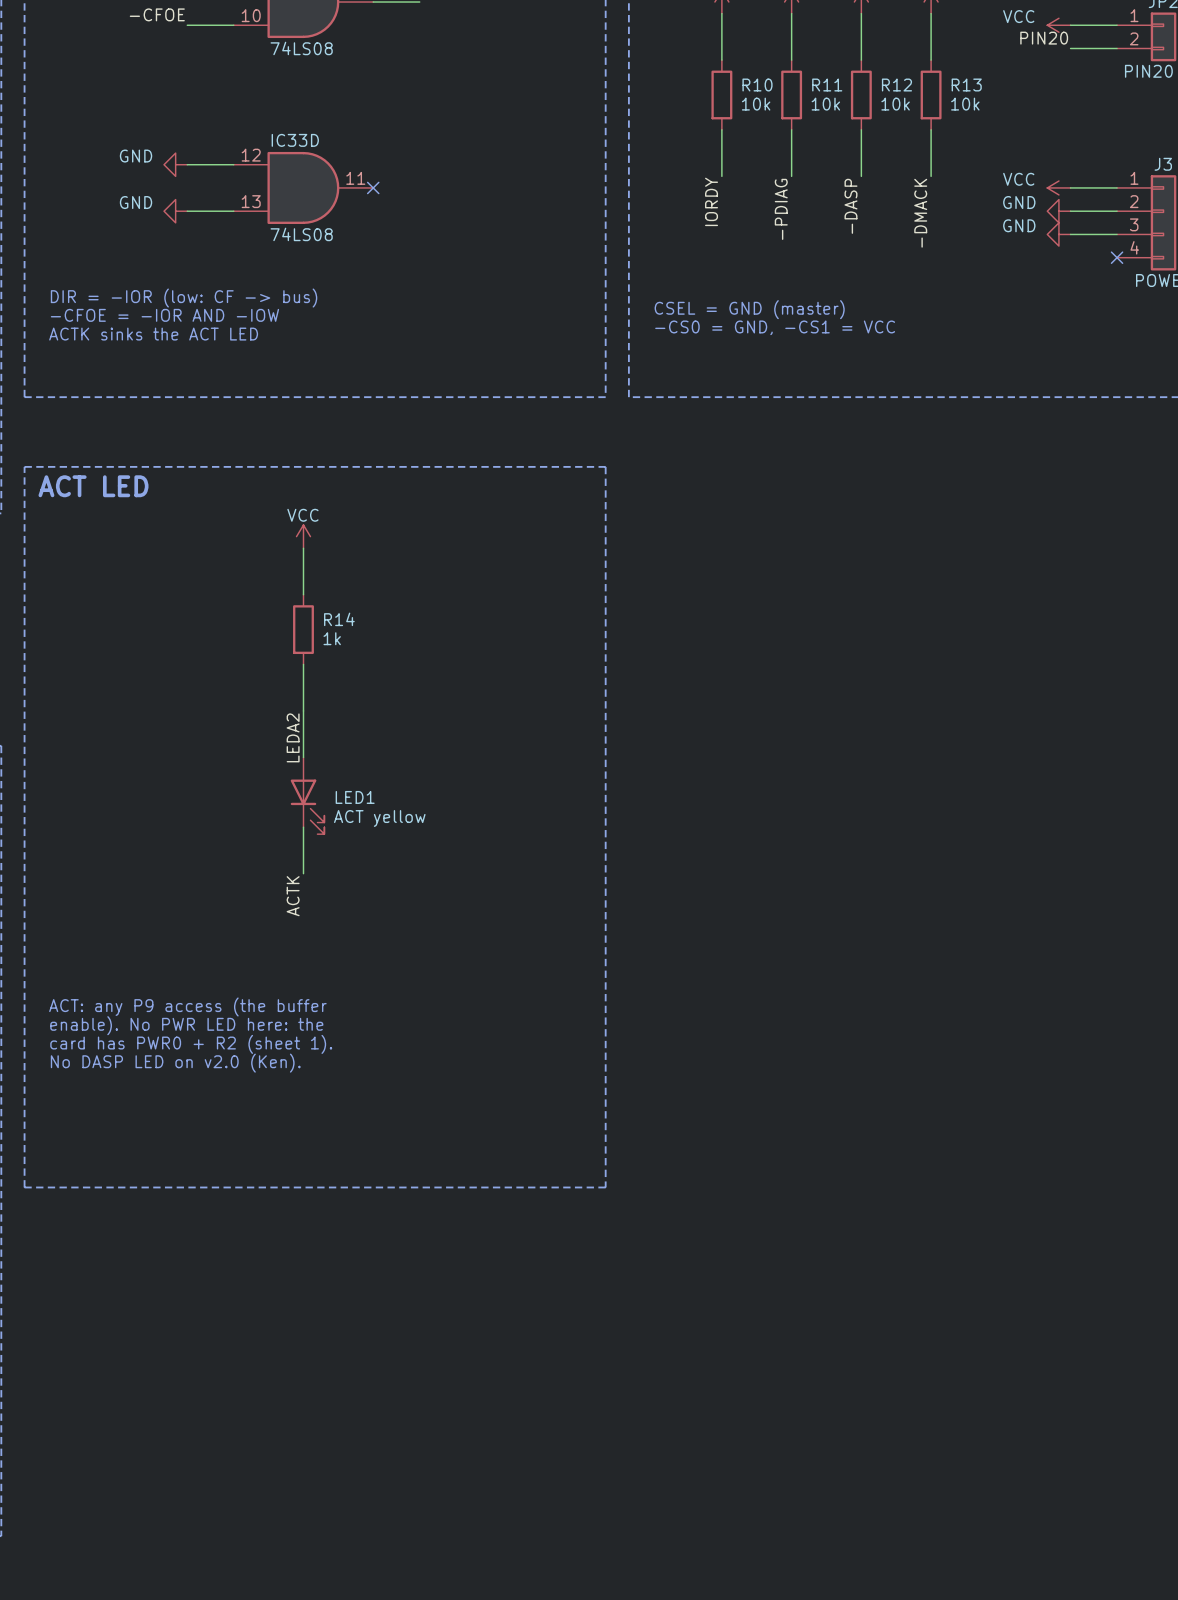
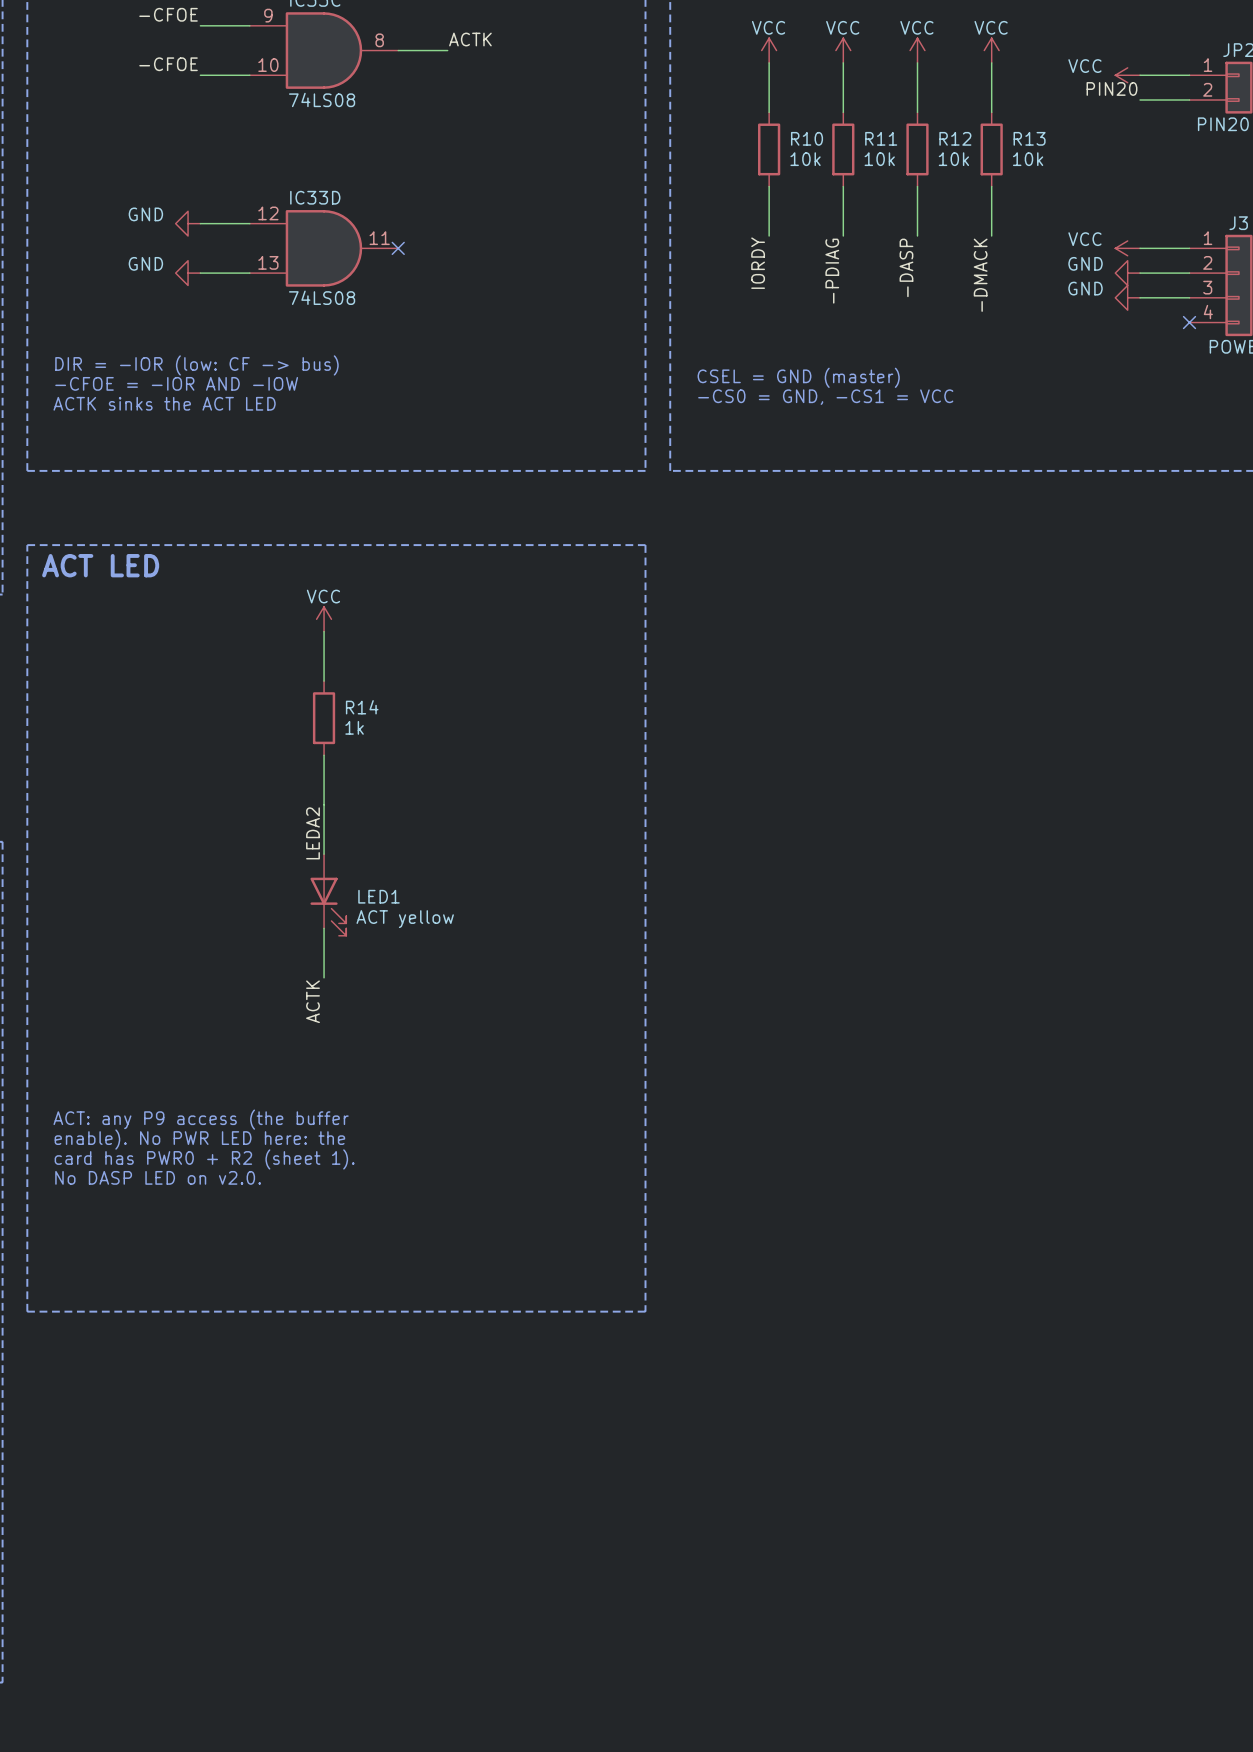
text: No DASP LED on v2.0 (Ken). (175, 1063) -> No DASP LED on v2.0. (158, 1177)

